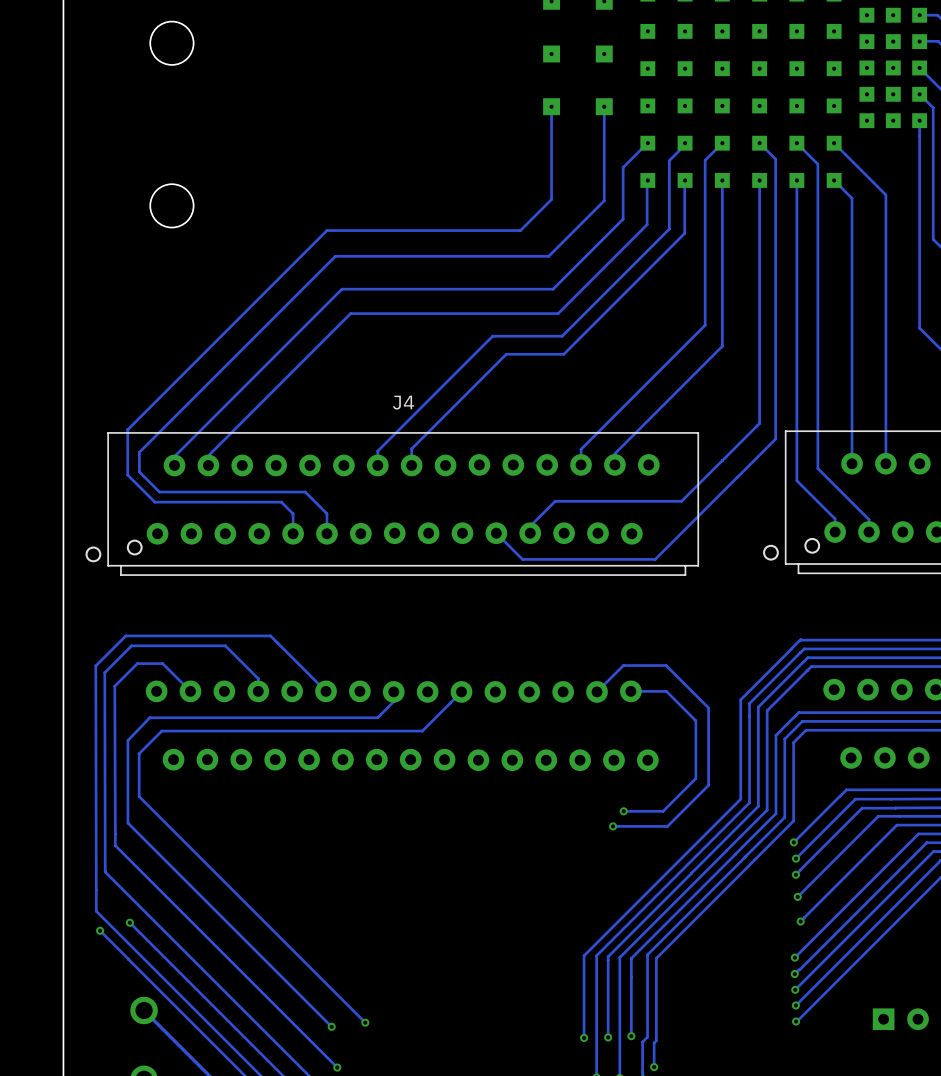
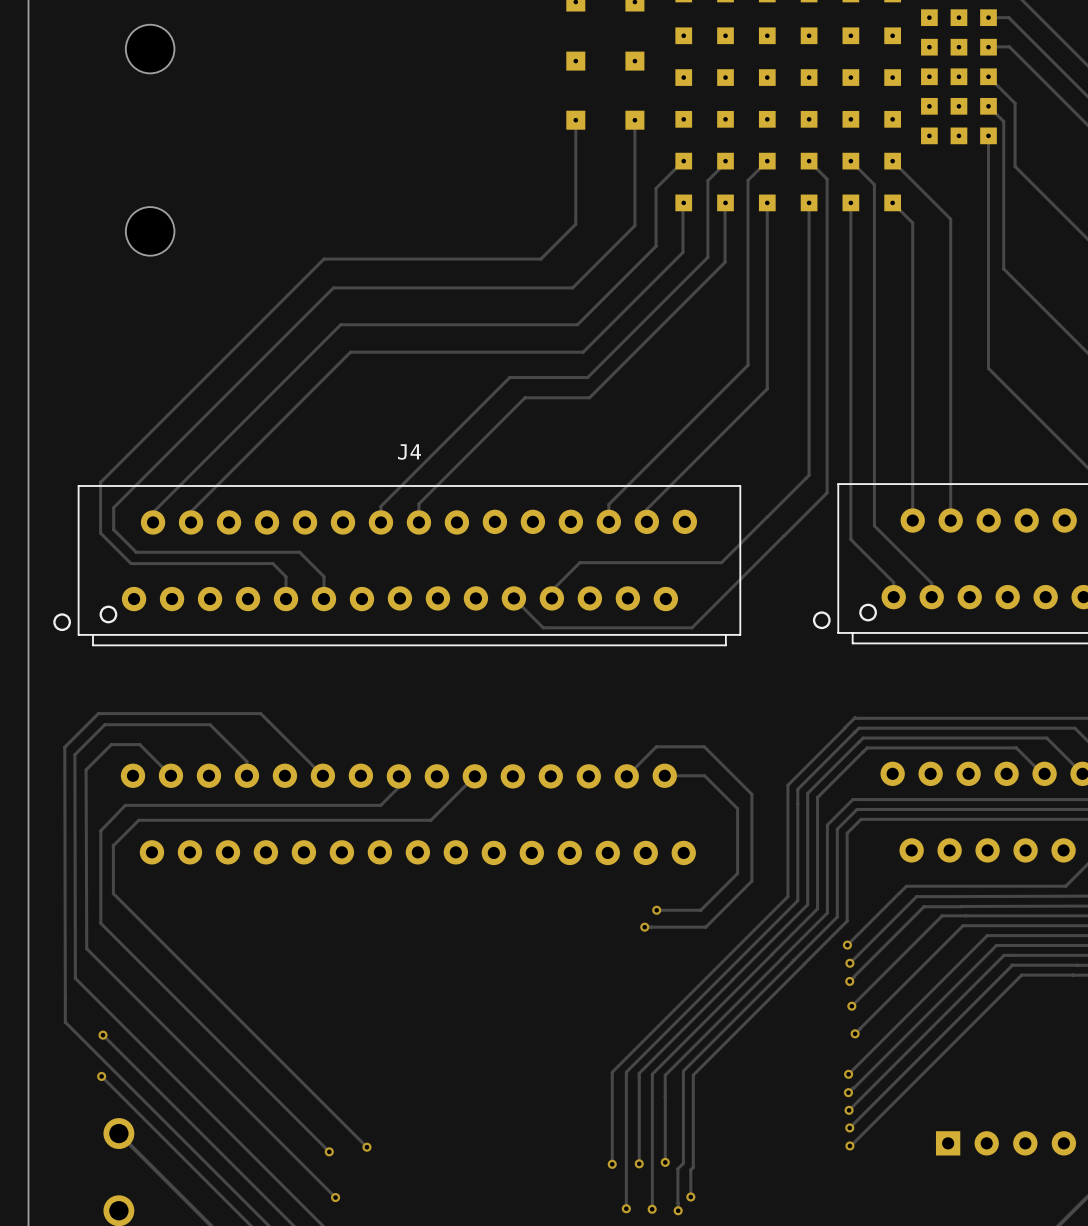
track: (100, 930) (128, 959) -> none
via position: (100, 930) -> (101, 1076)

